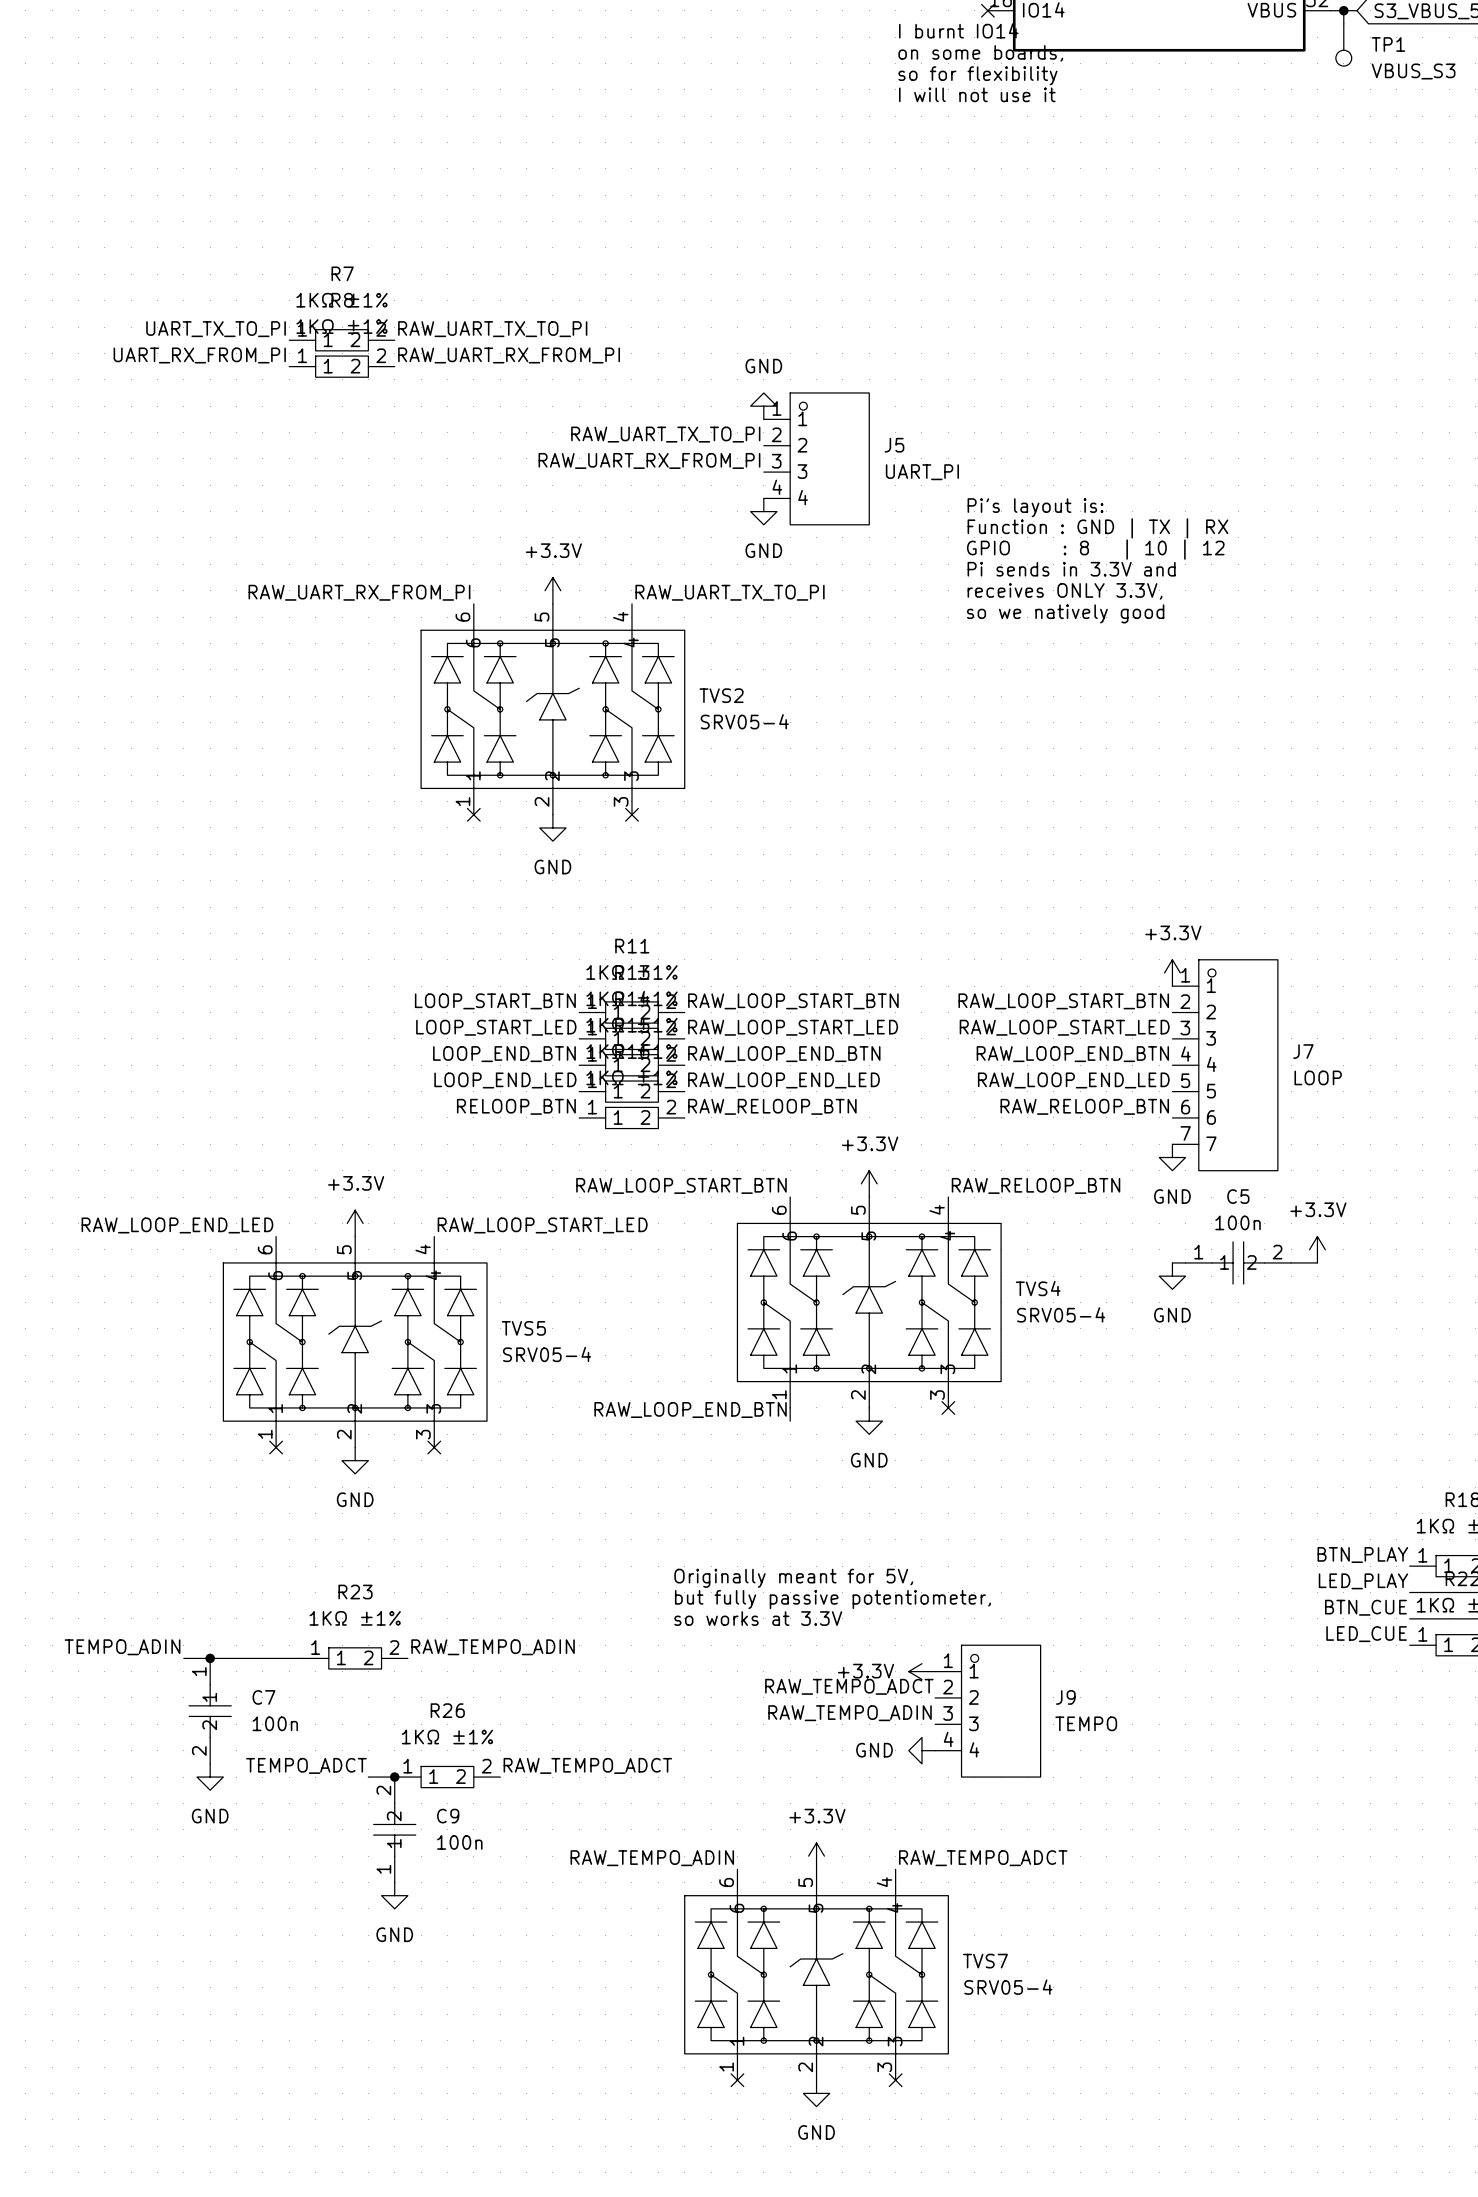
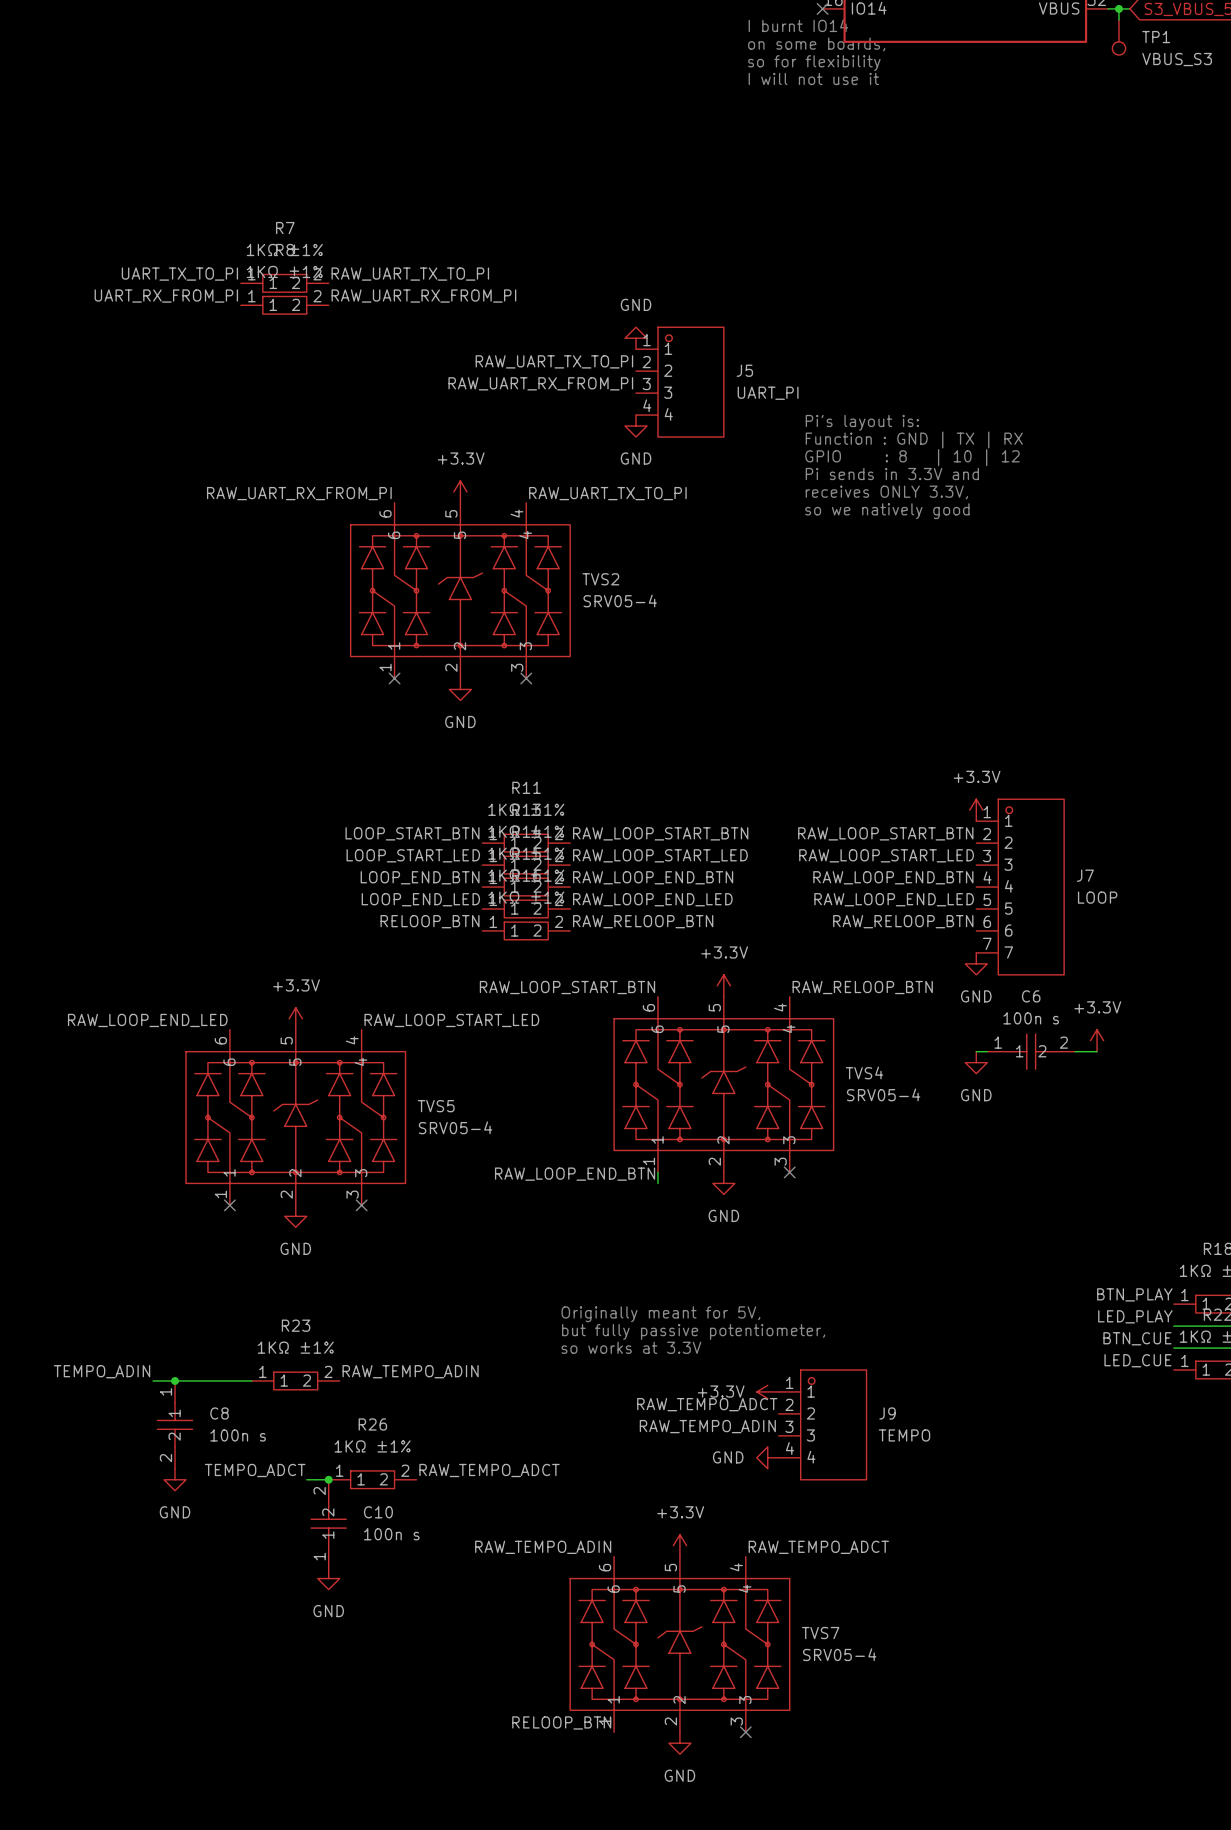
C5 name: C5 (1238, 1196) -> C6 (1031, 996)
C5 value: 100n (1238, 1222) -> 100n s (1031, 1018)
C7 name: C7 (263, 1697) -> C8 (219, 1413)
C7 value: 100n (275, 1723) -> 100n s (238, 1435)
C9 name: C9 (448, 1816) -> C10 (378, 1512)
C9 value: 100n (459, 1842) -> 100n s (391, 1534)
label: none -> RELOOP_BTN (561, 1722)
no-connect mark: (737, 2080) -> none

